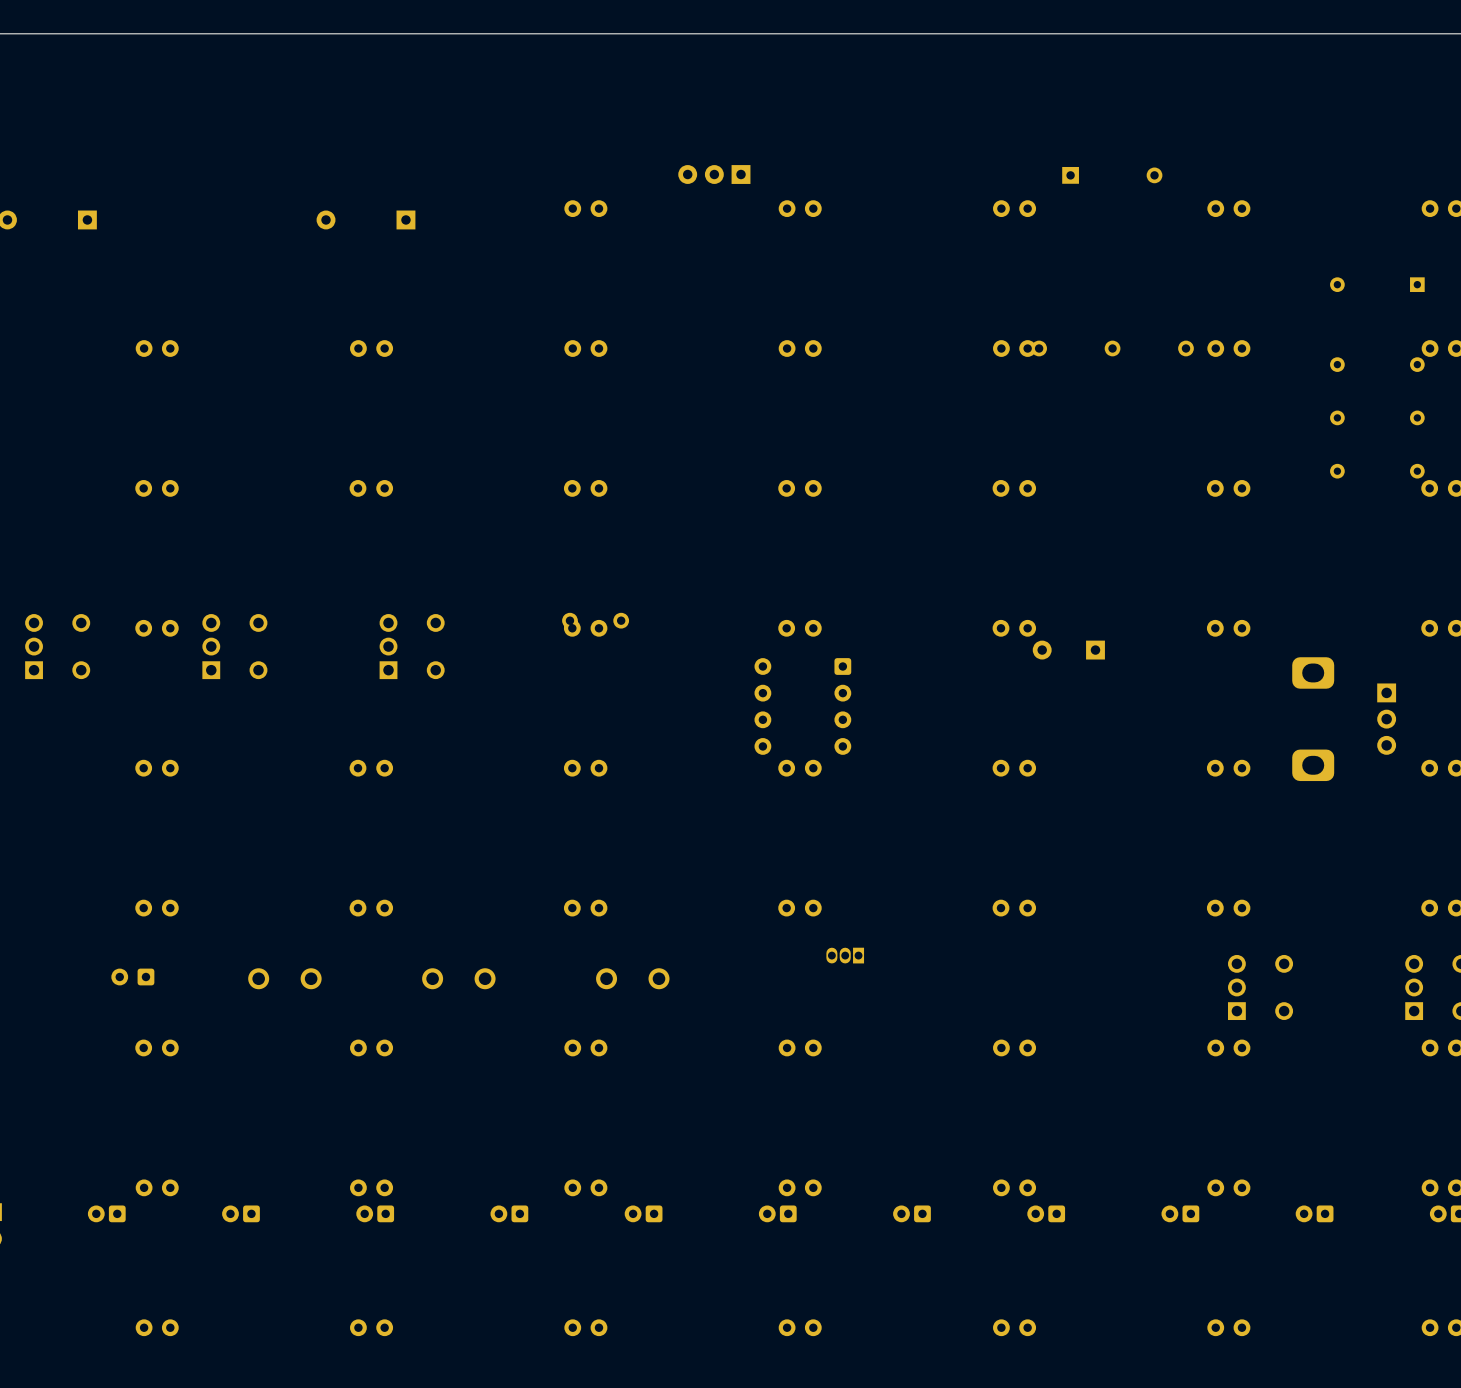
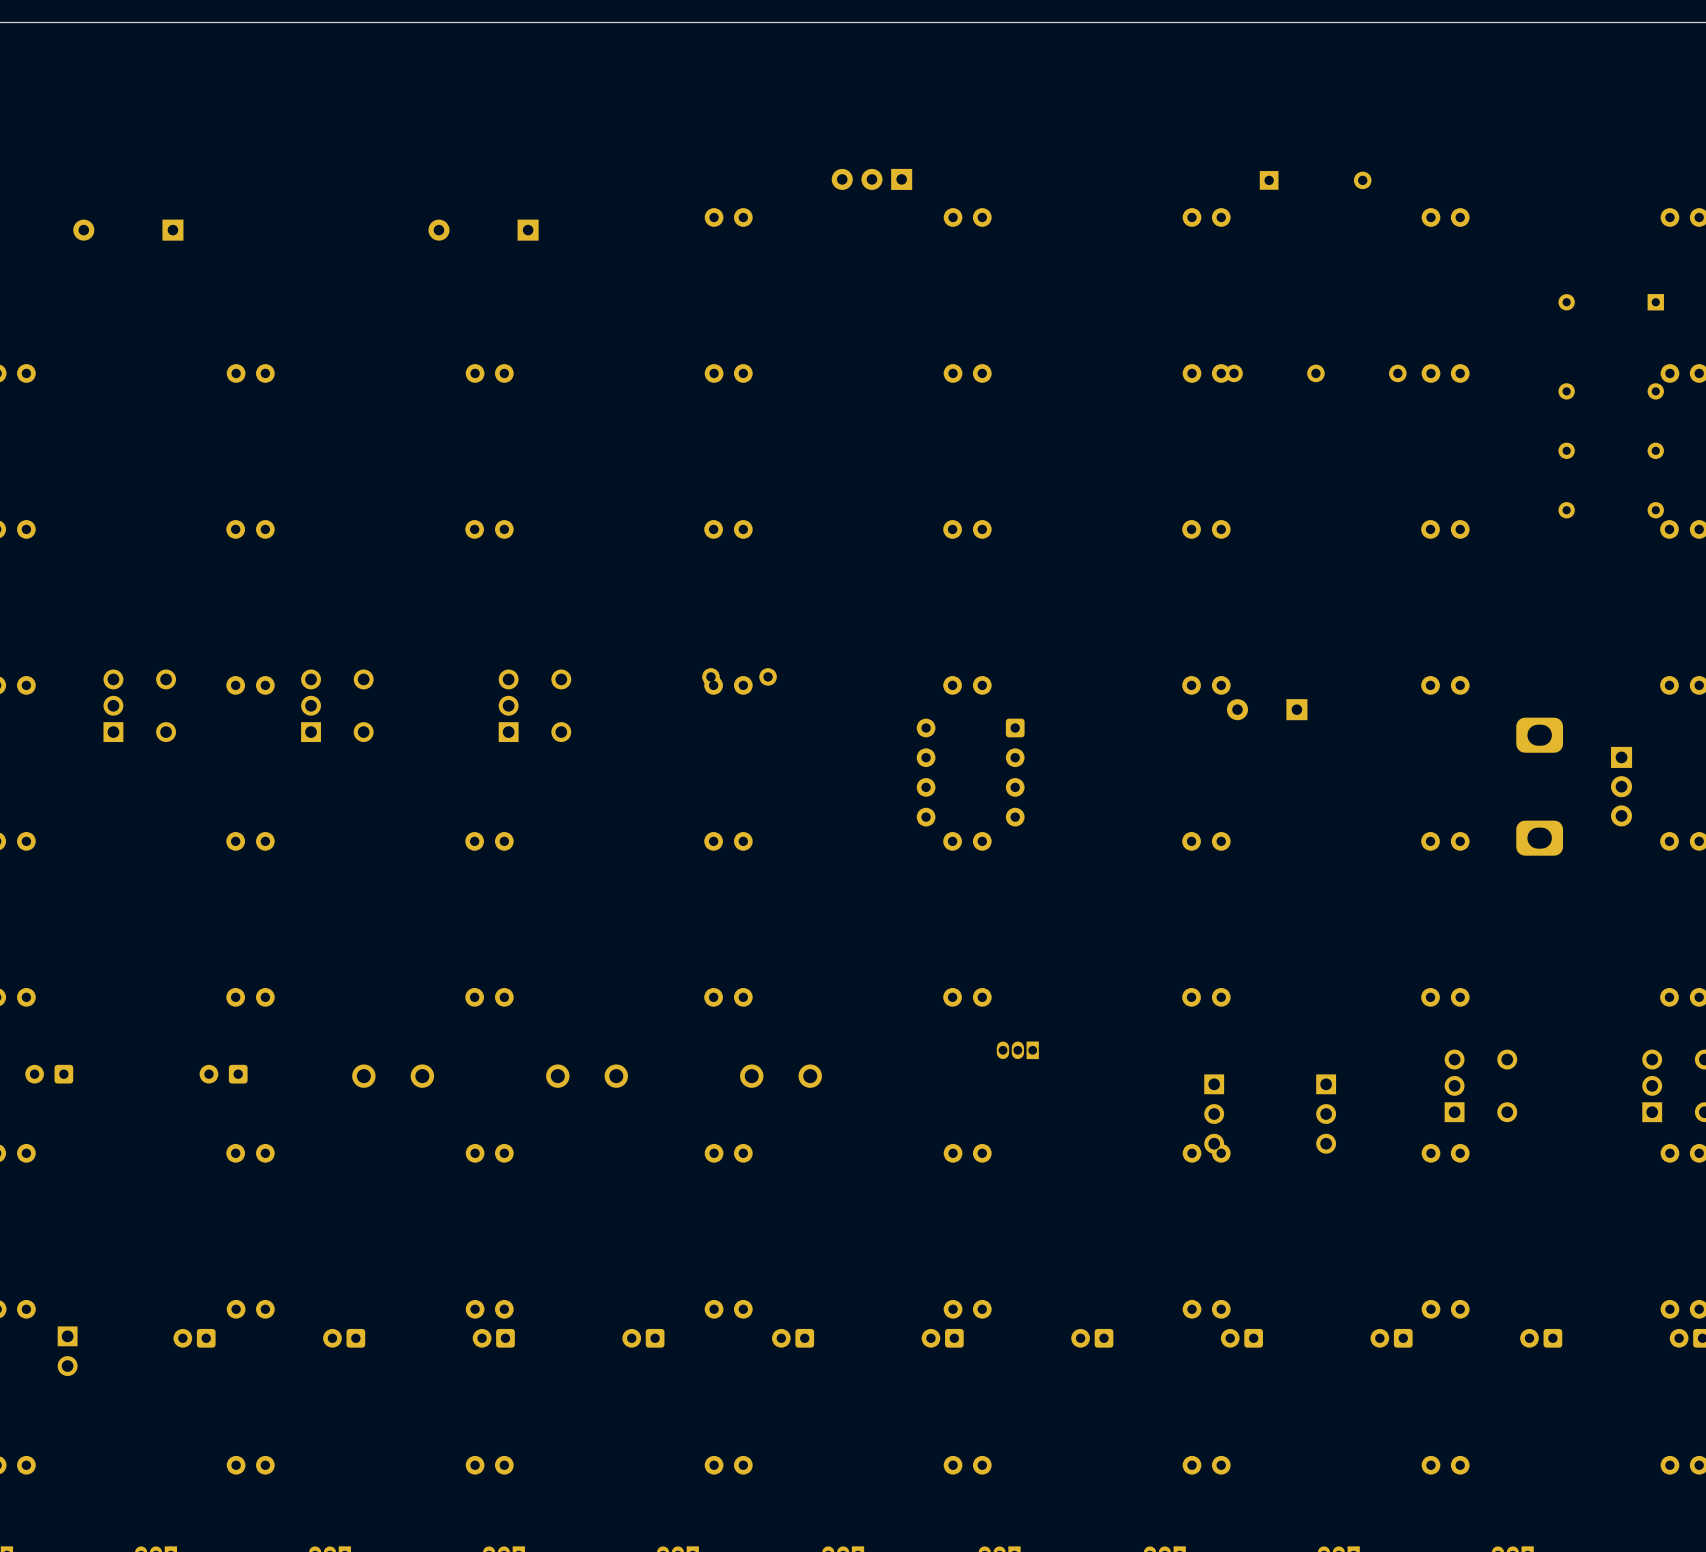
part: none -> (1214, 1114)
part: none -> (1326, 1114)

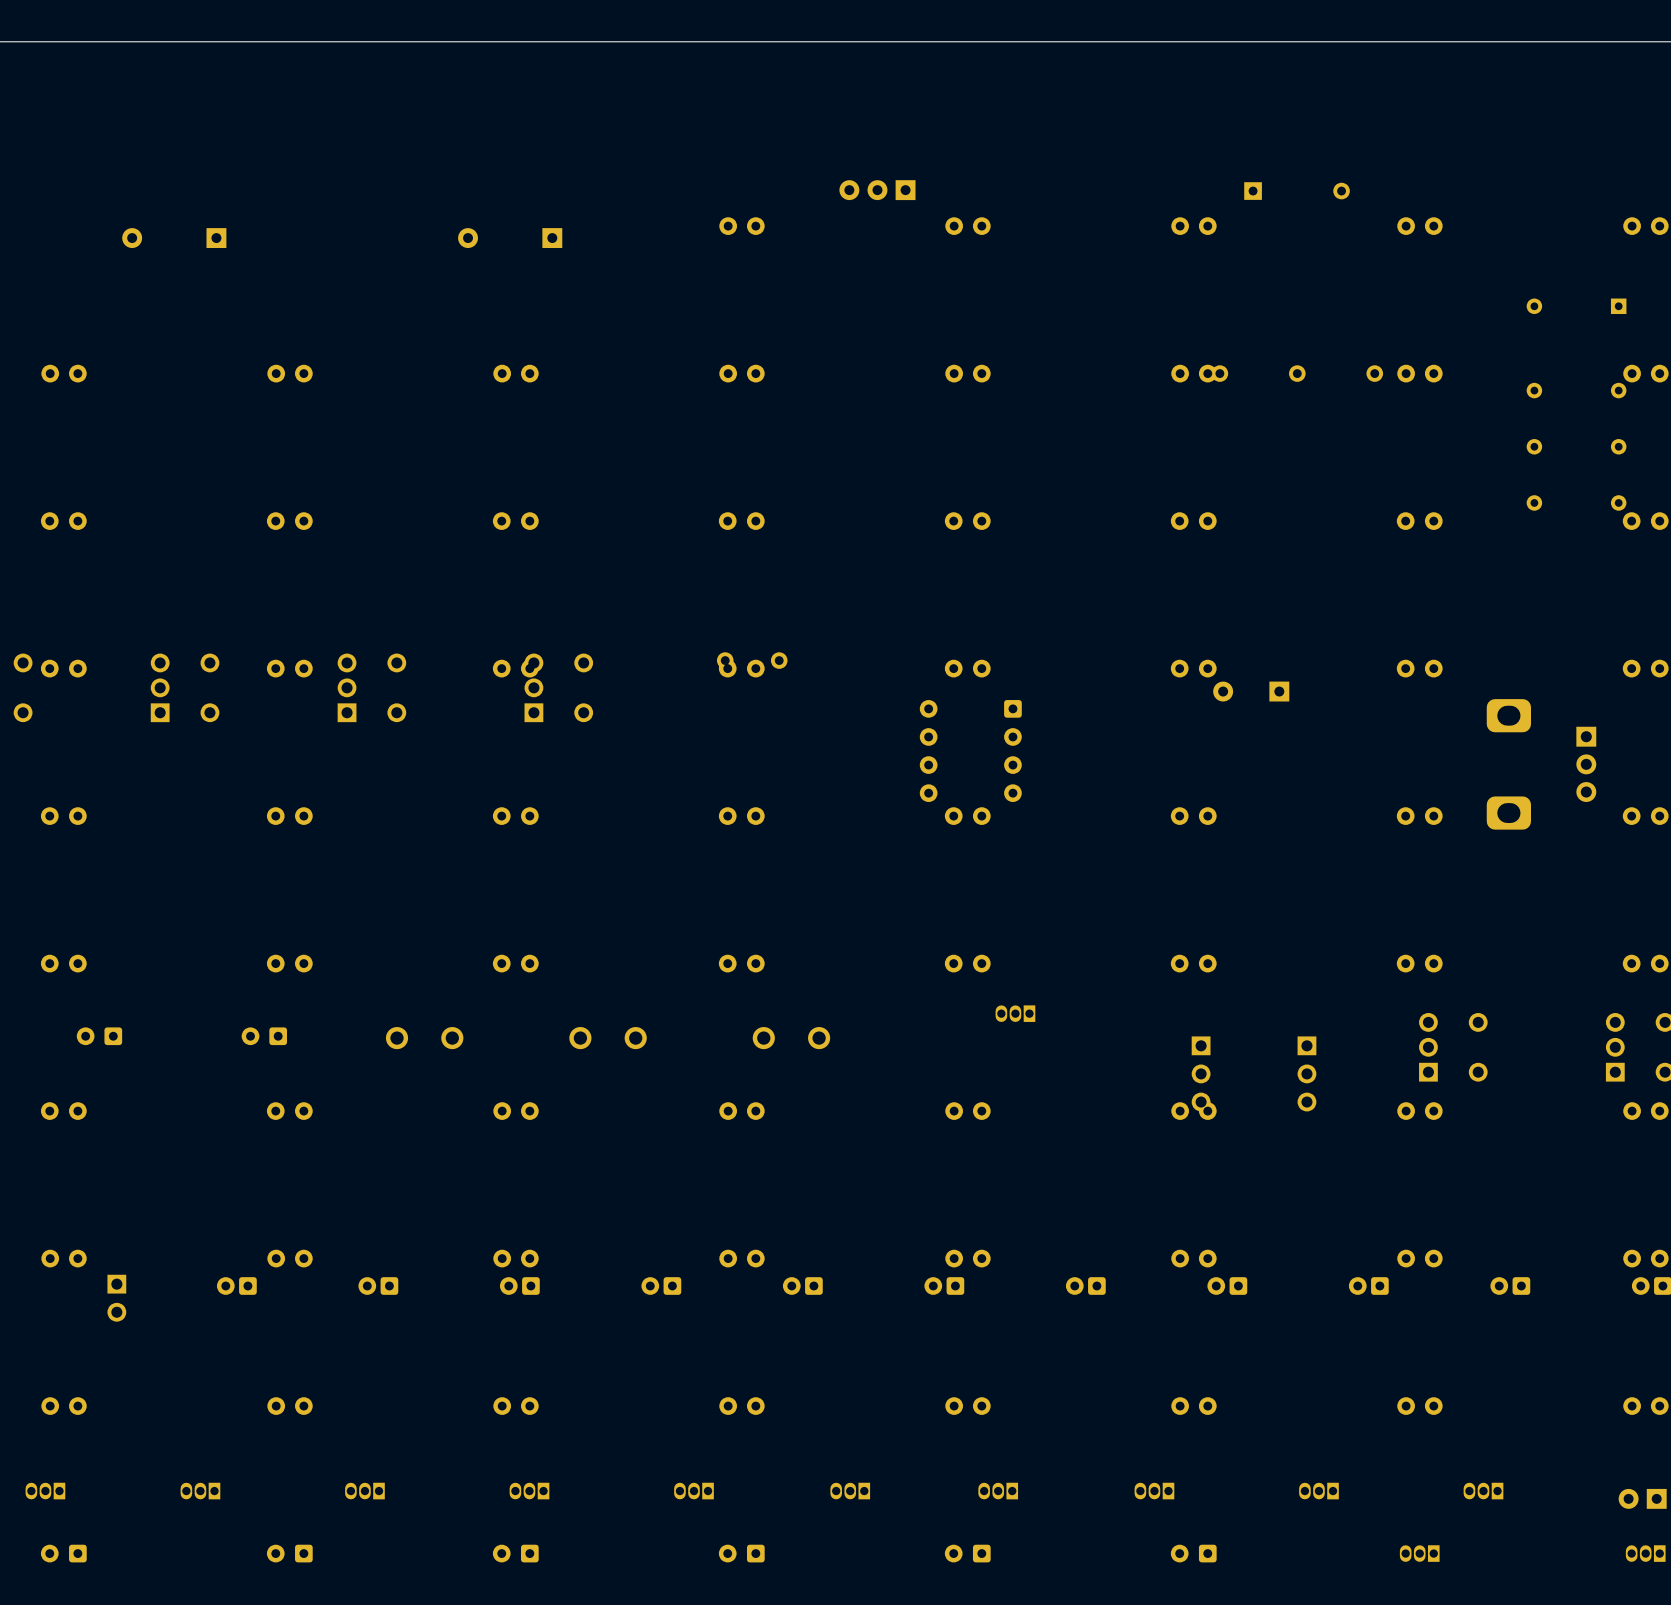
part: none -> (515, 668)

